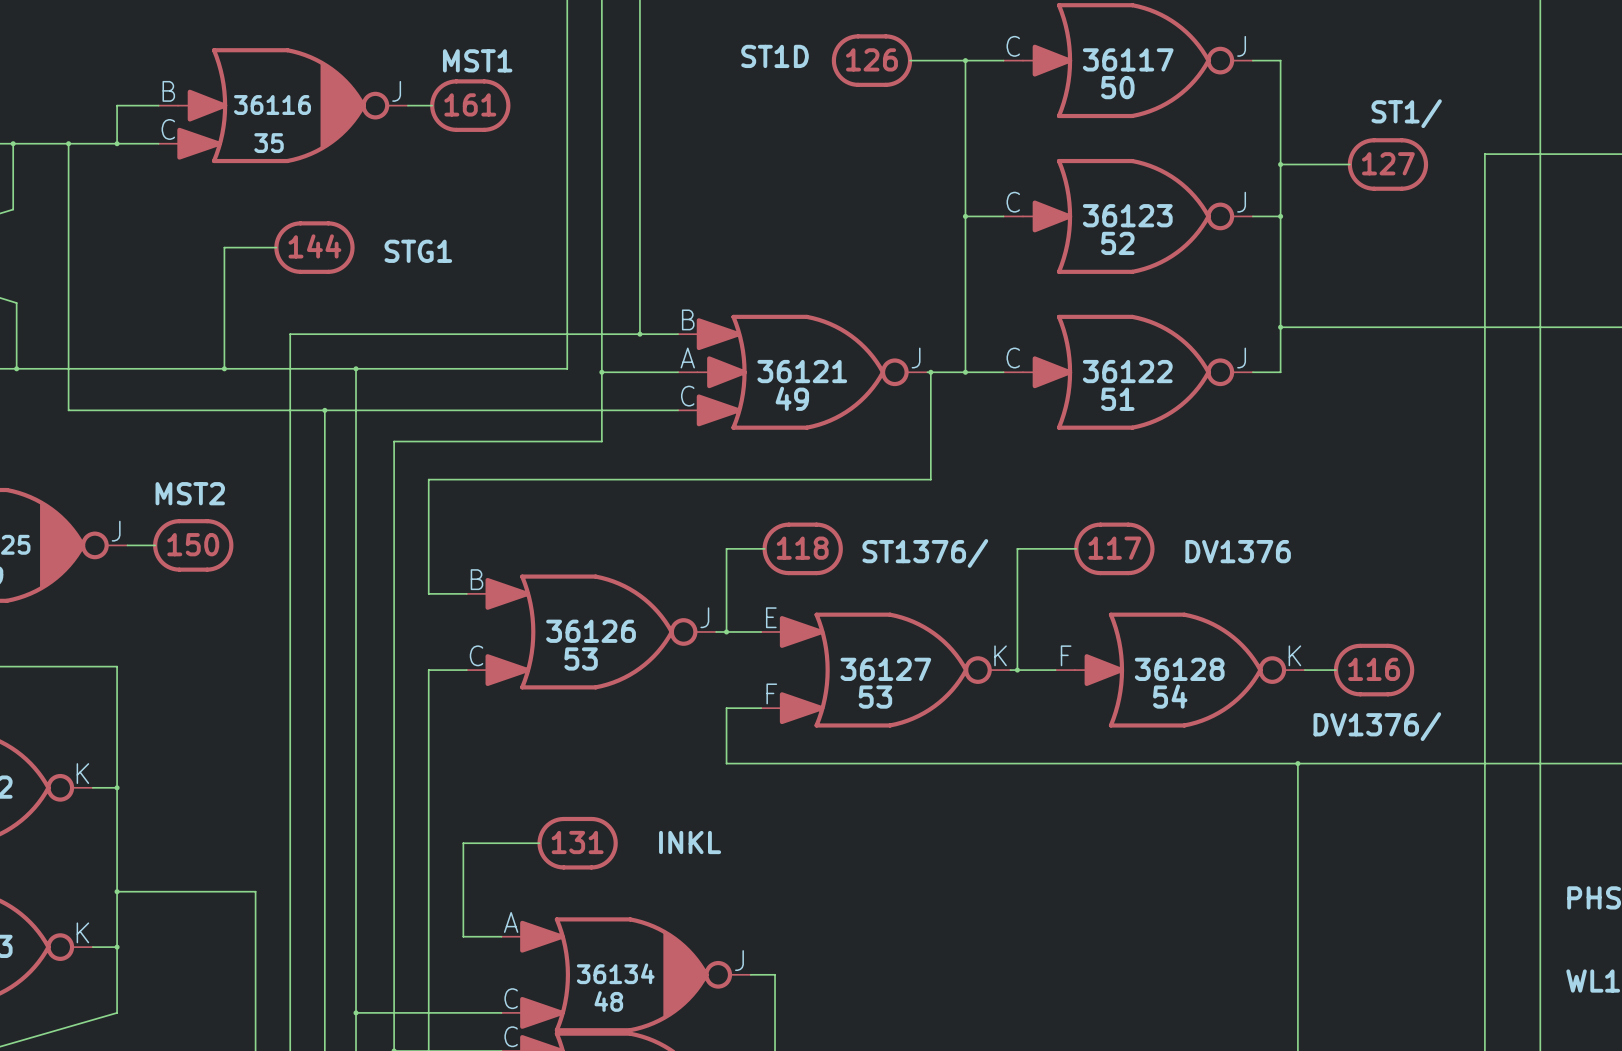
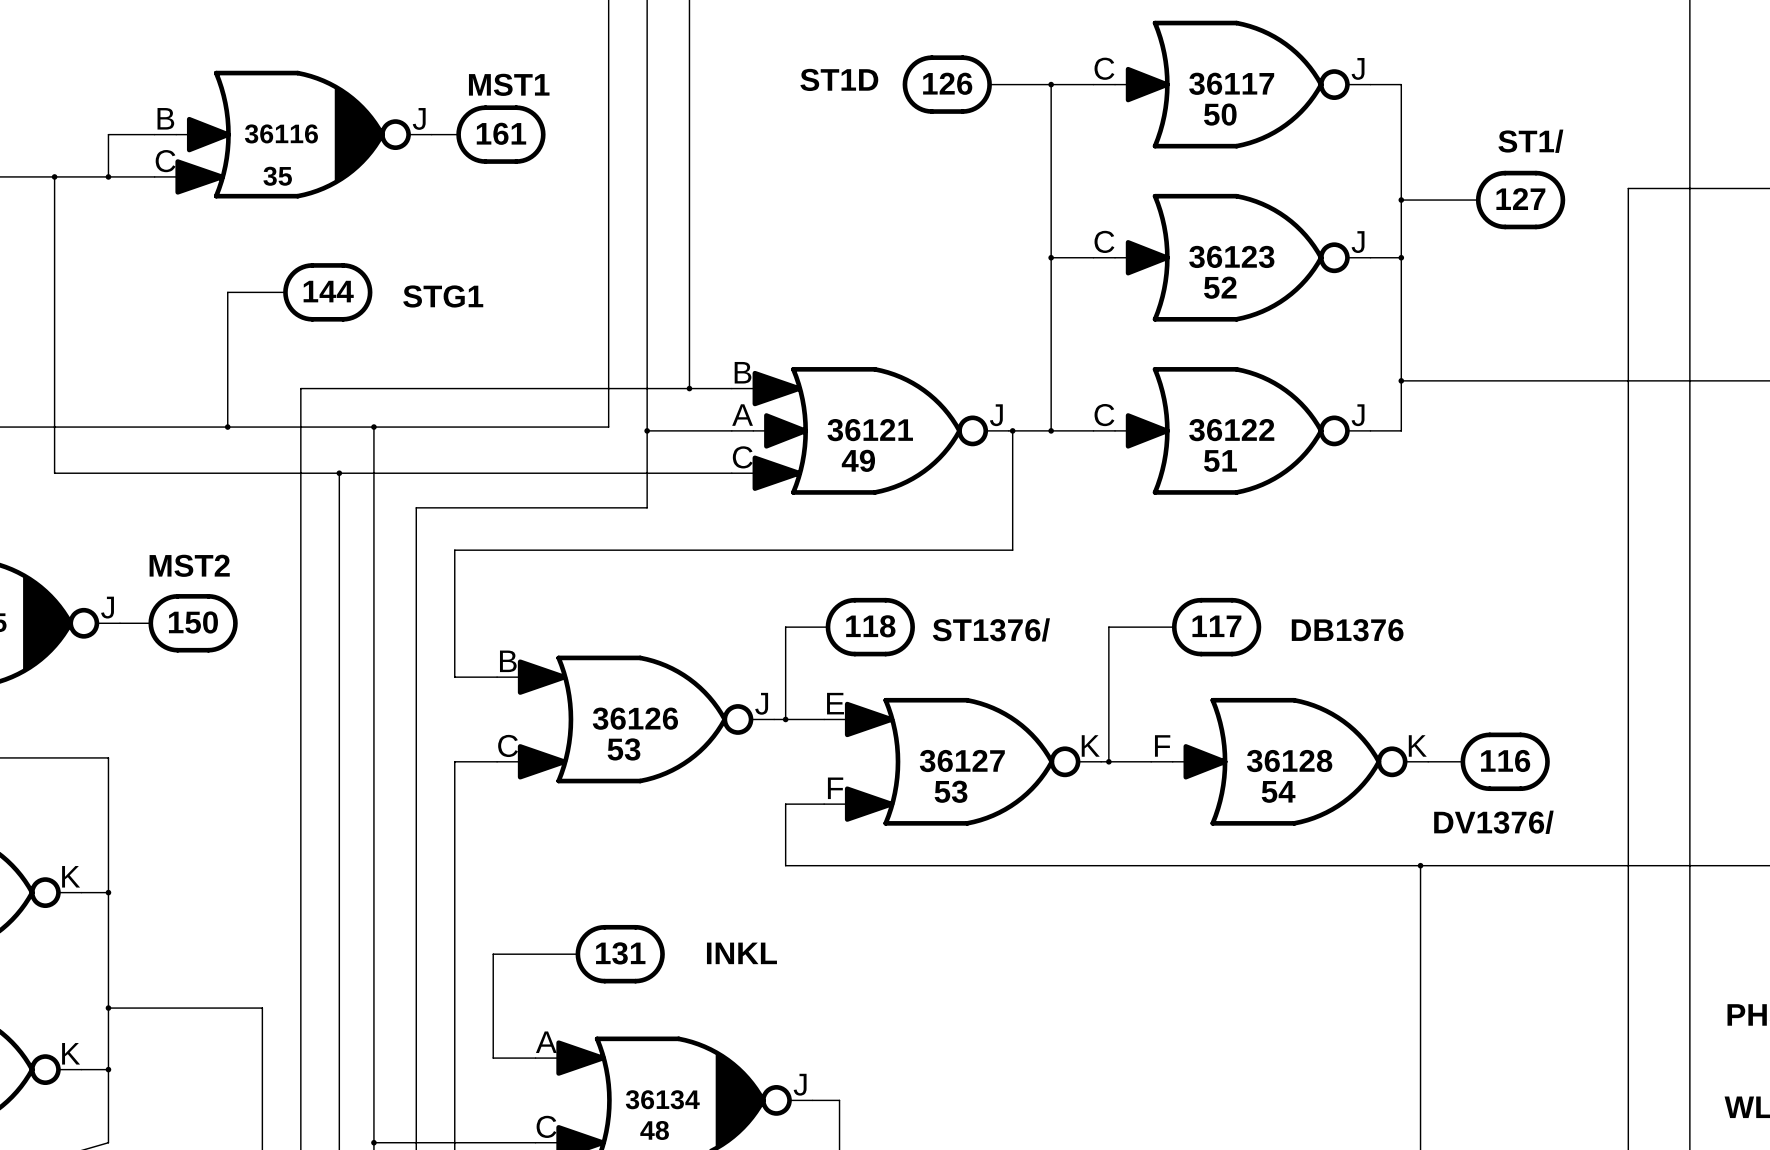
part text: DV1376 (1238, 551) -> DB1376 (1347, 630)

